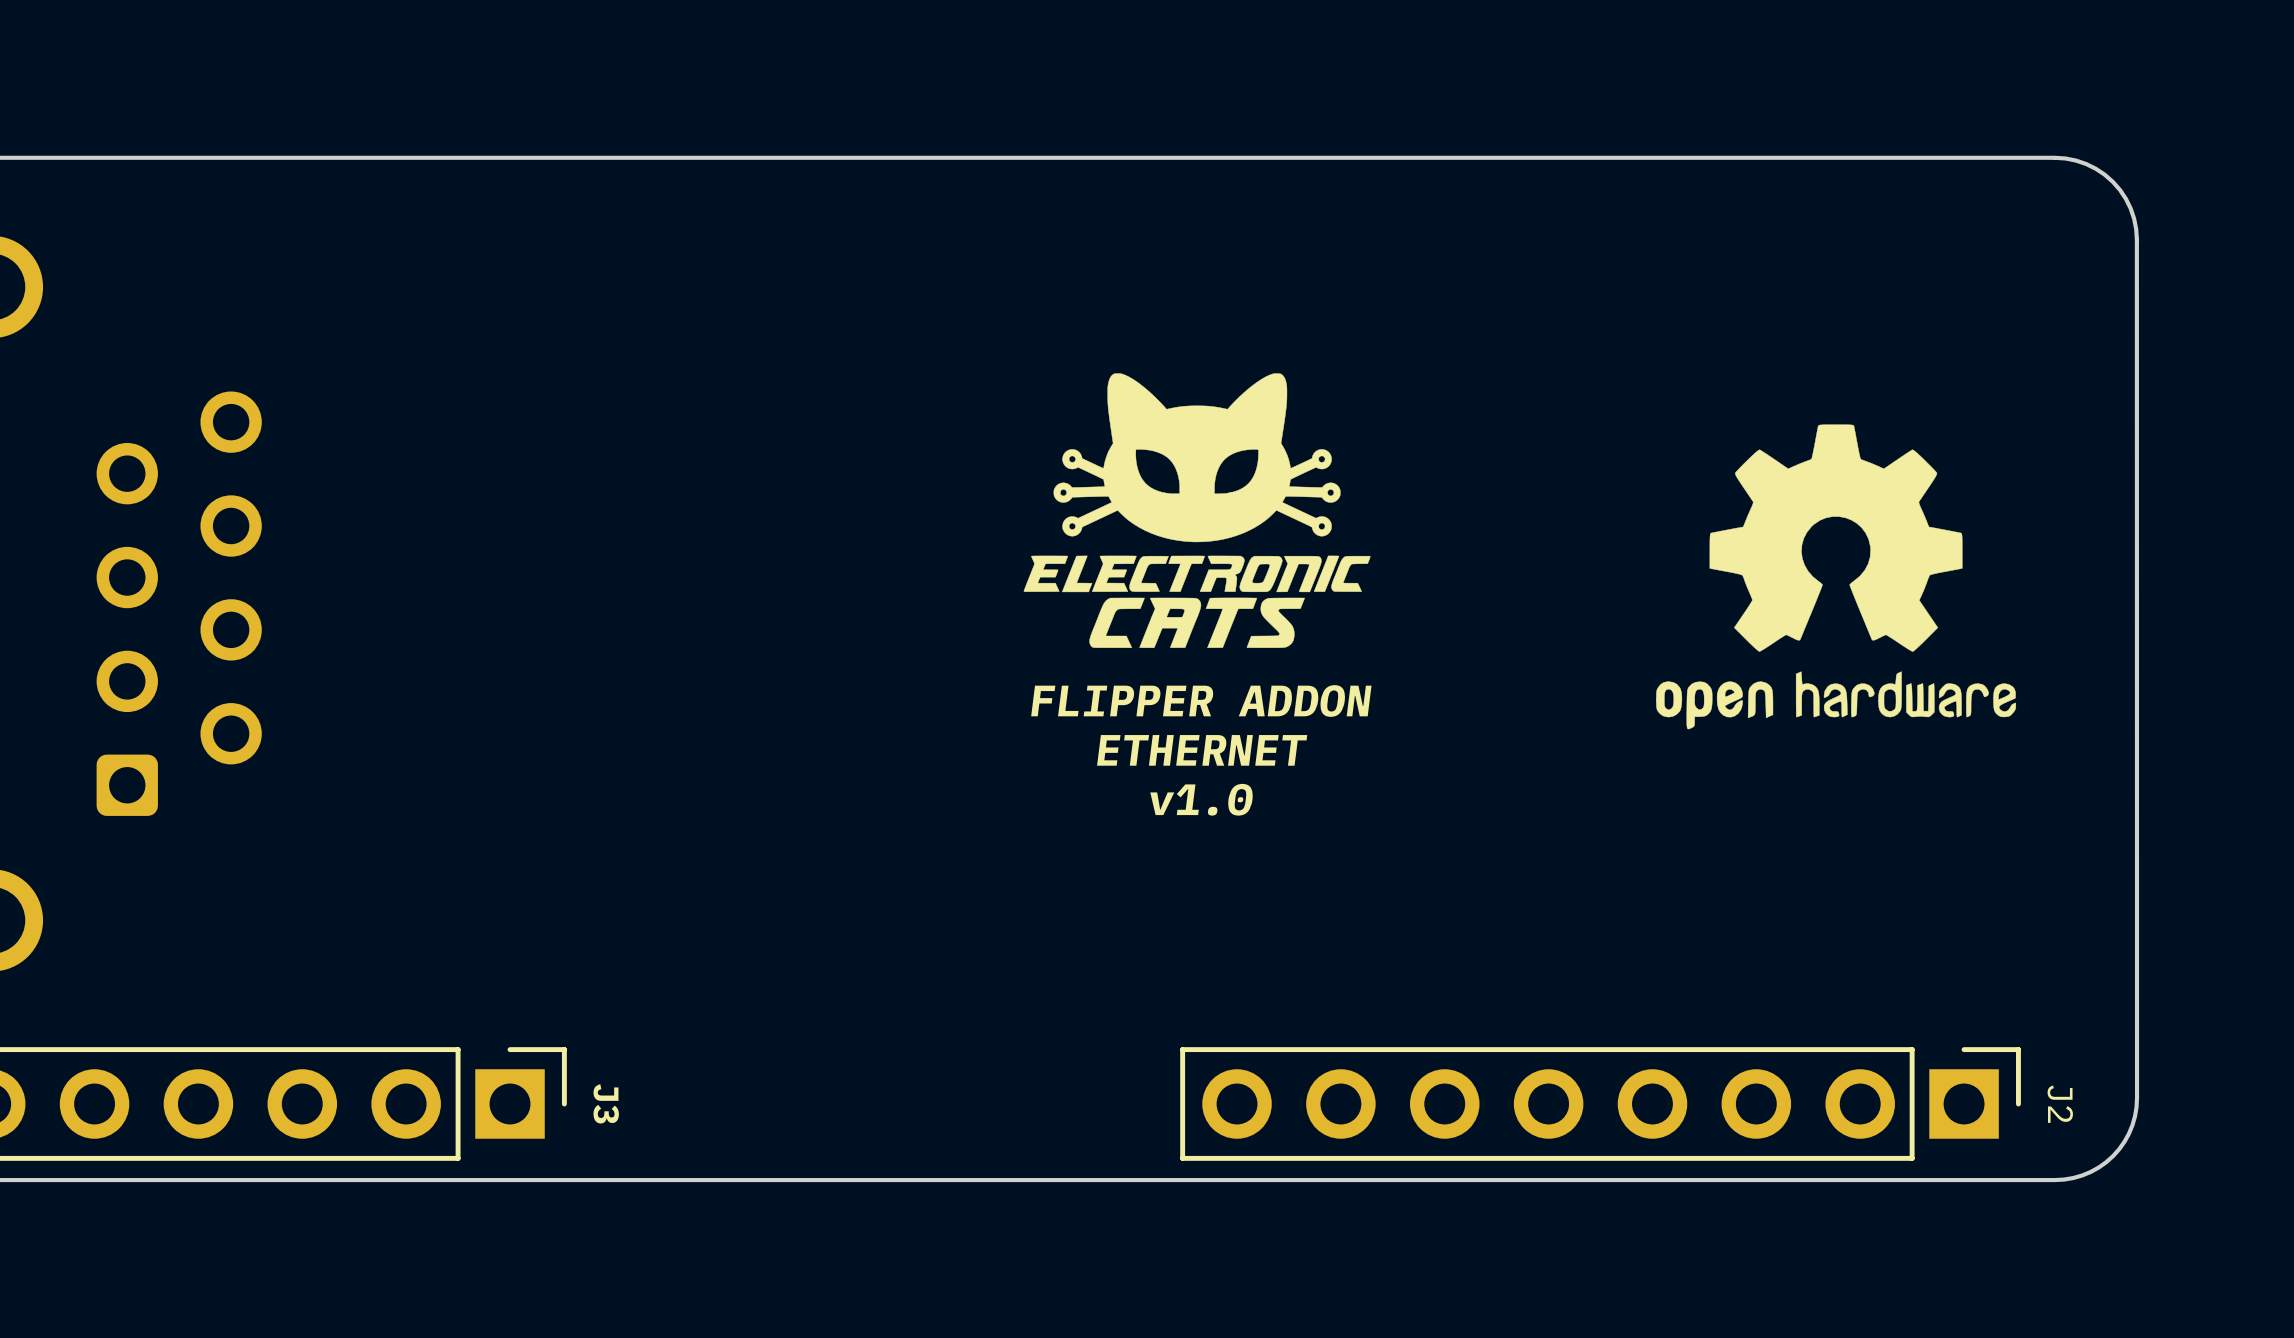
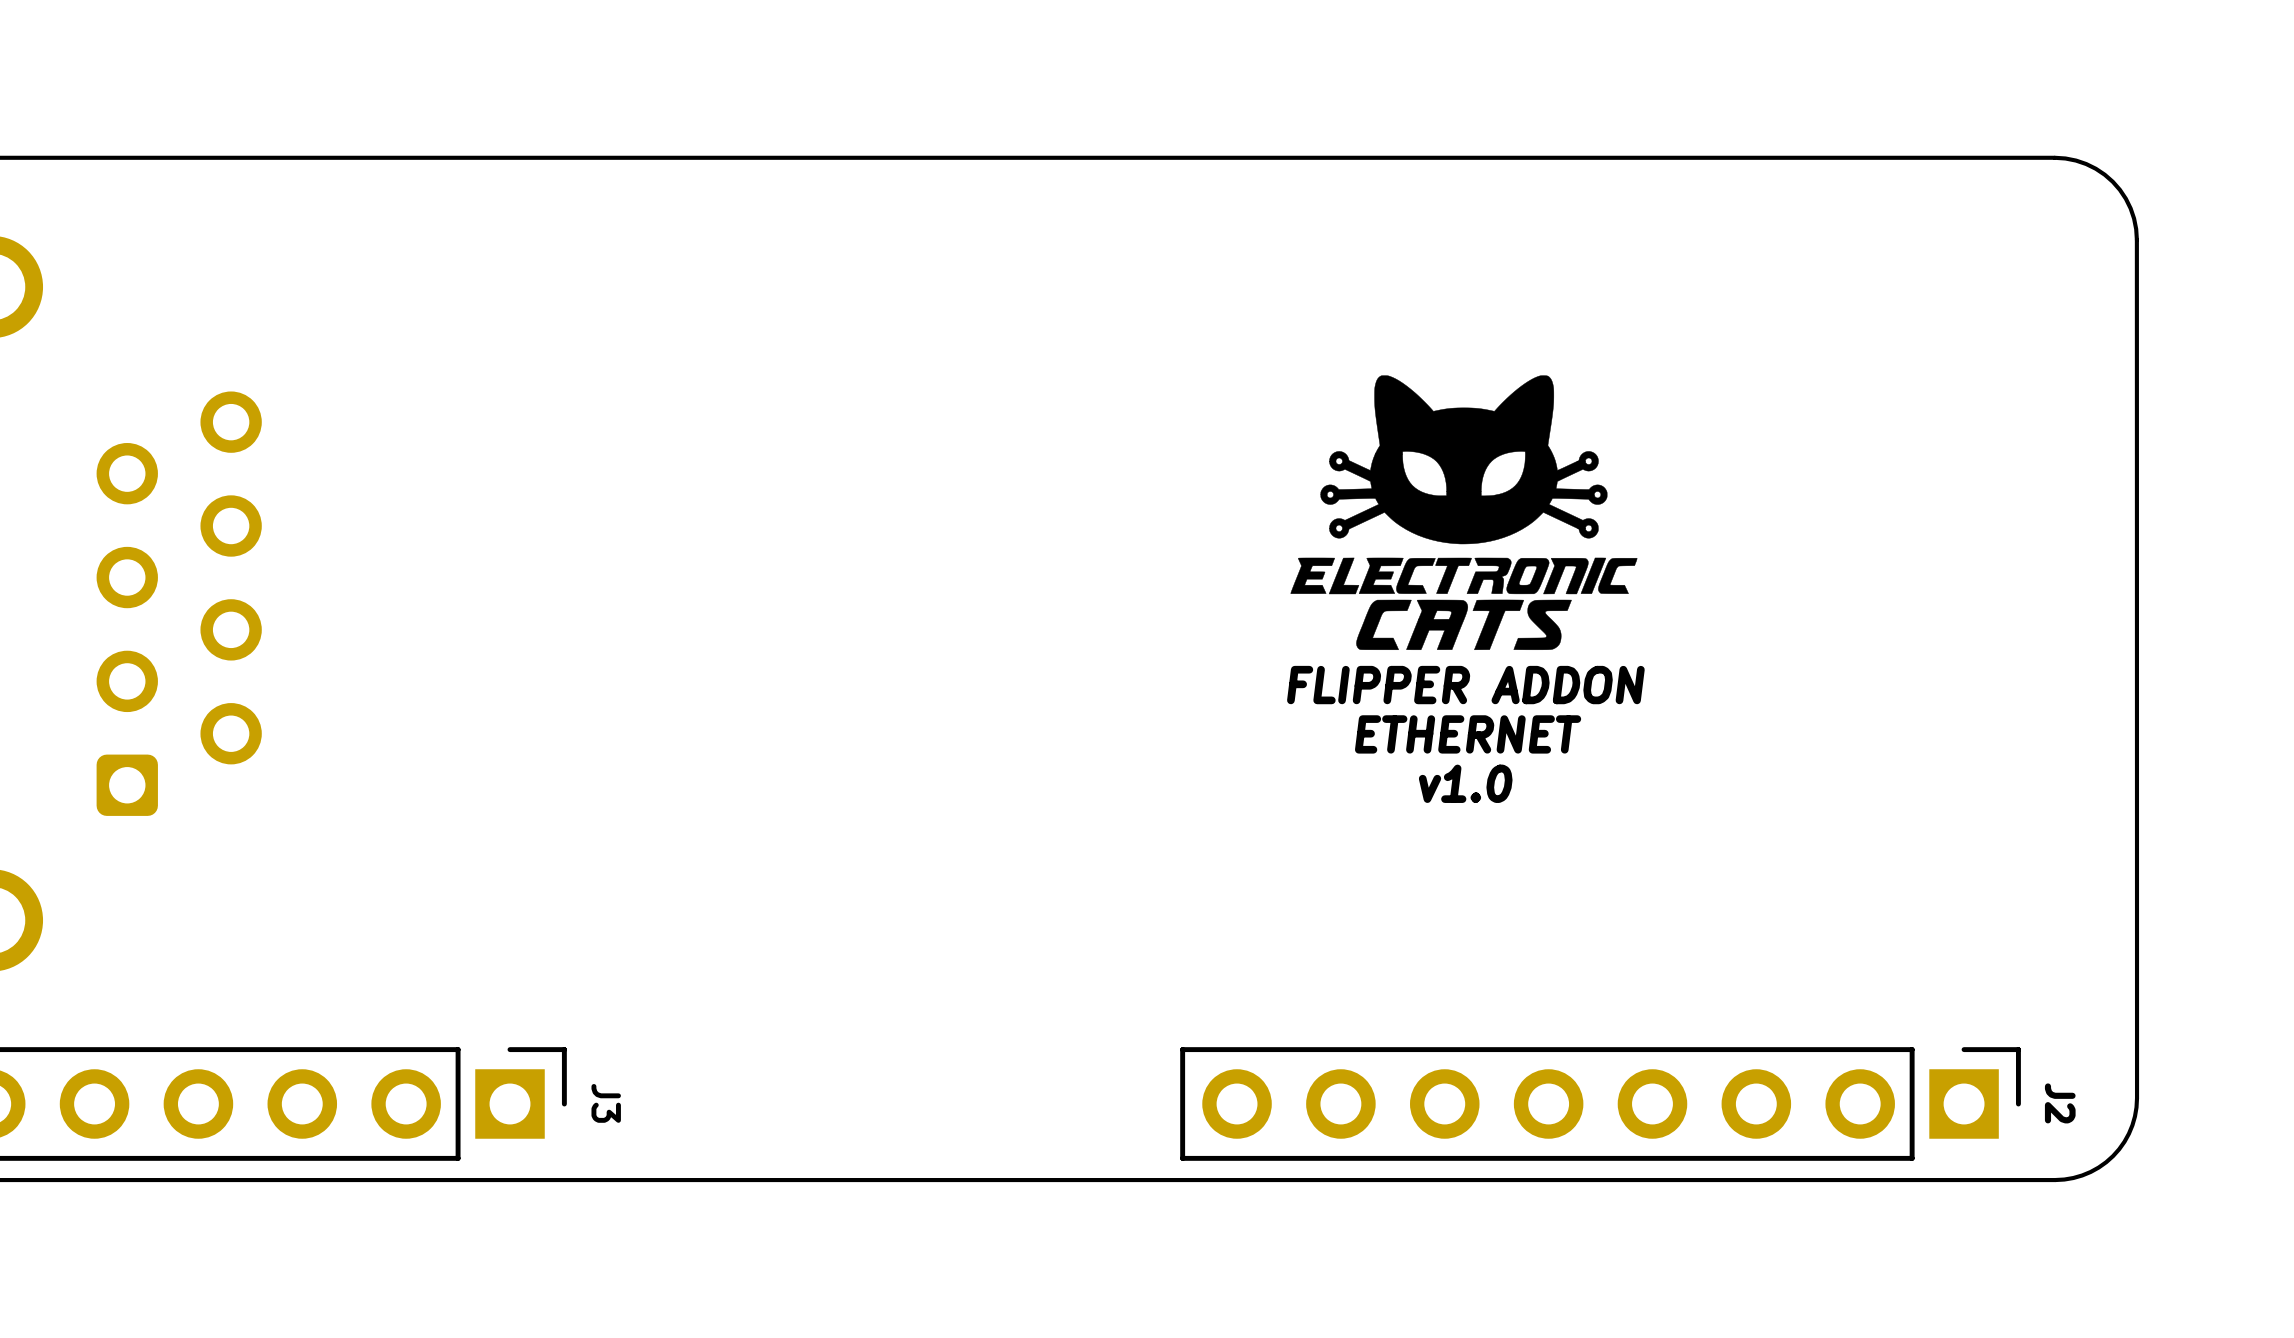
drawing: [1656, 424, 2017, 730] -> none
drawing position: (1197, 510) -> (1463, 512)
text position: FLIPPER ADDON (1201, 700) -> FLIPPER ADDON (1465, 685)
text position: ETHERNET (1202, 750) -> ETHERNET (1468, 734)
text position: v1.0 (1201, 799) -> v1.0 (1465, 783)

